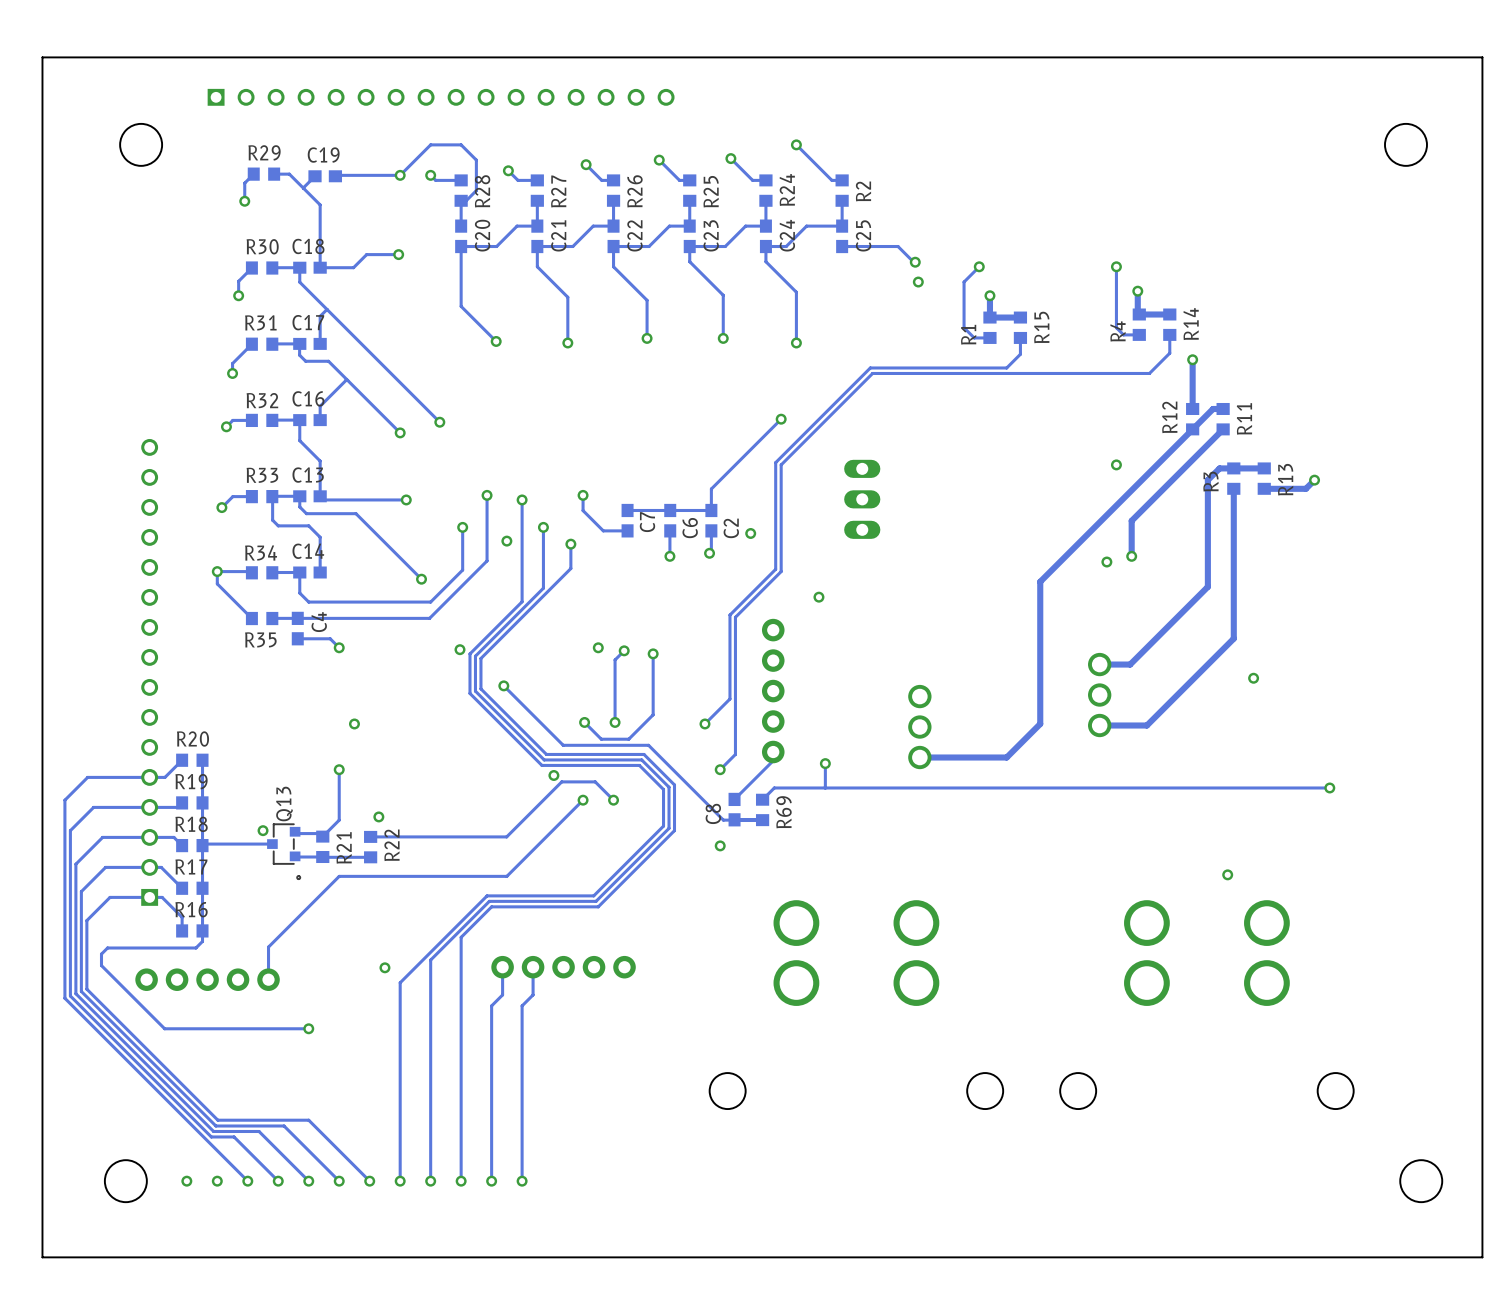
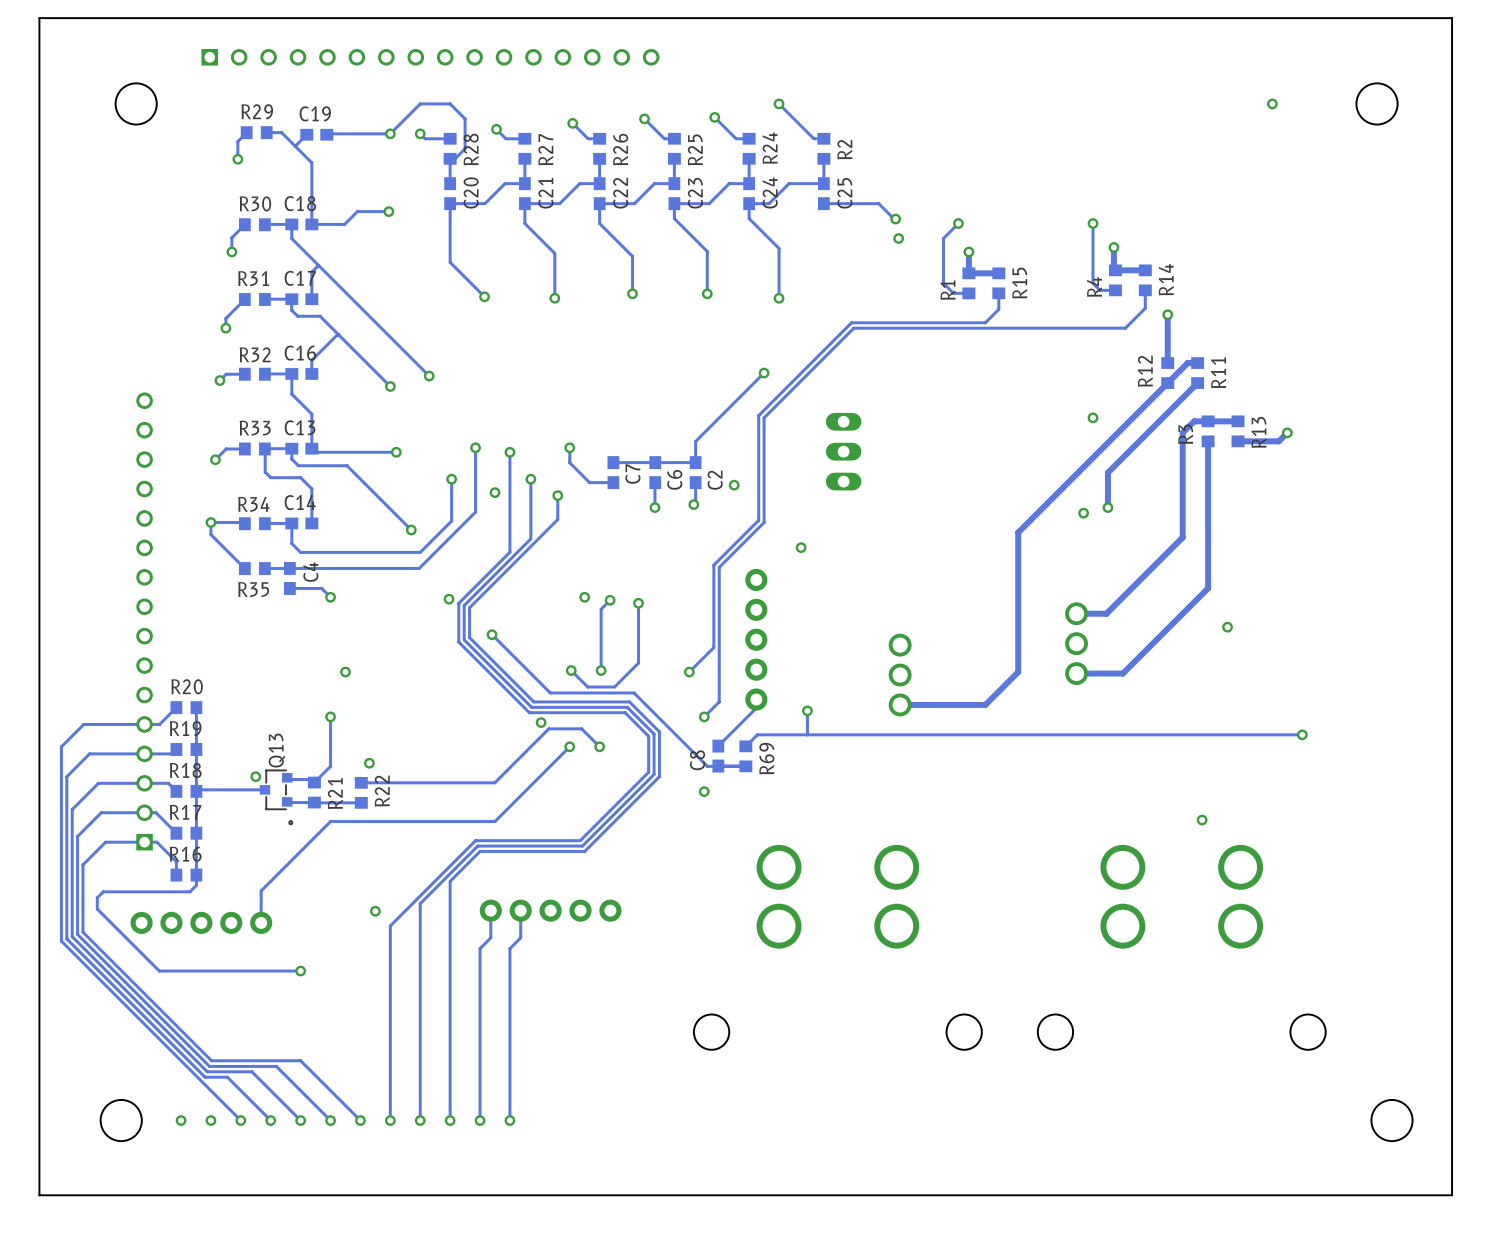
via: none -> (1272, 103)

